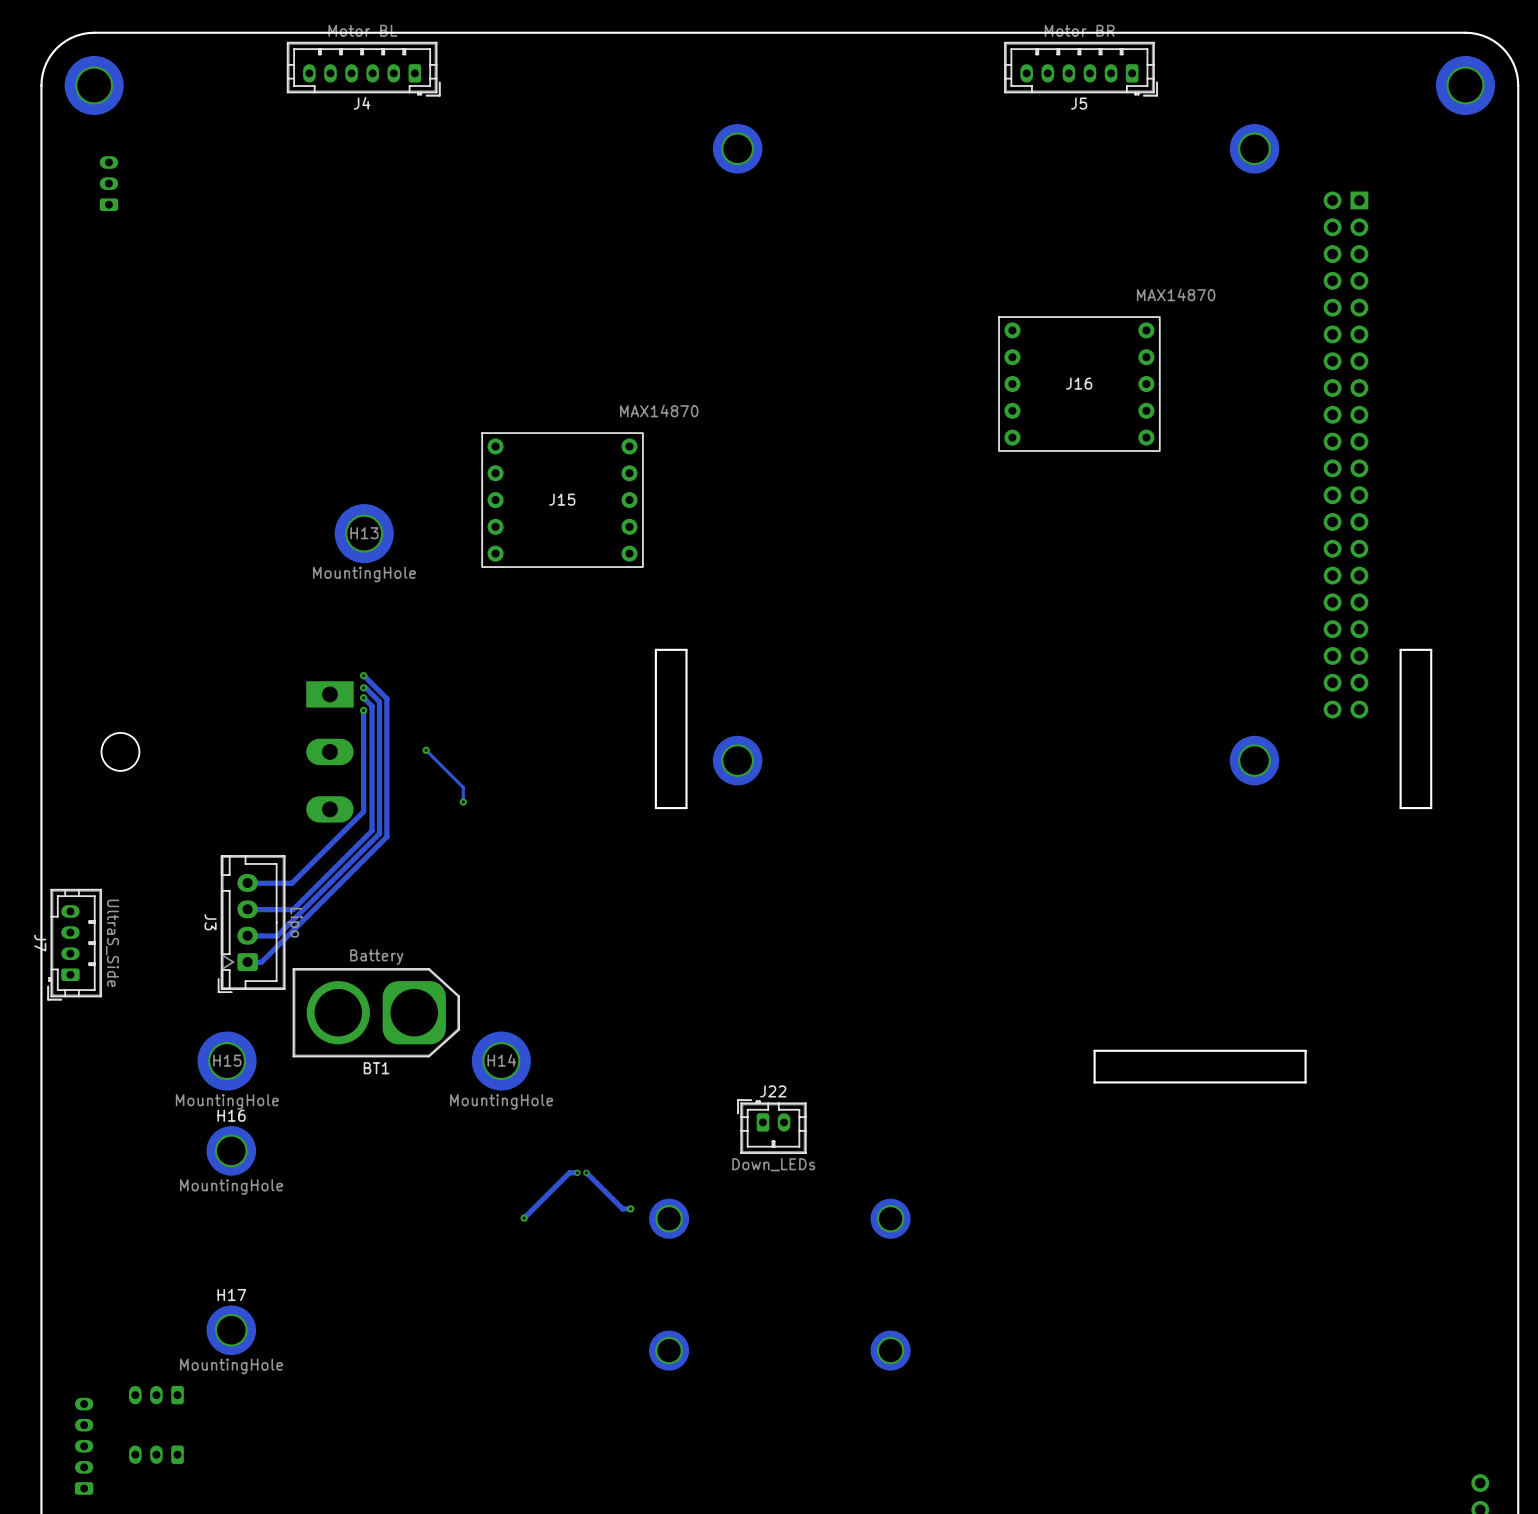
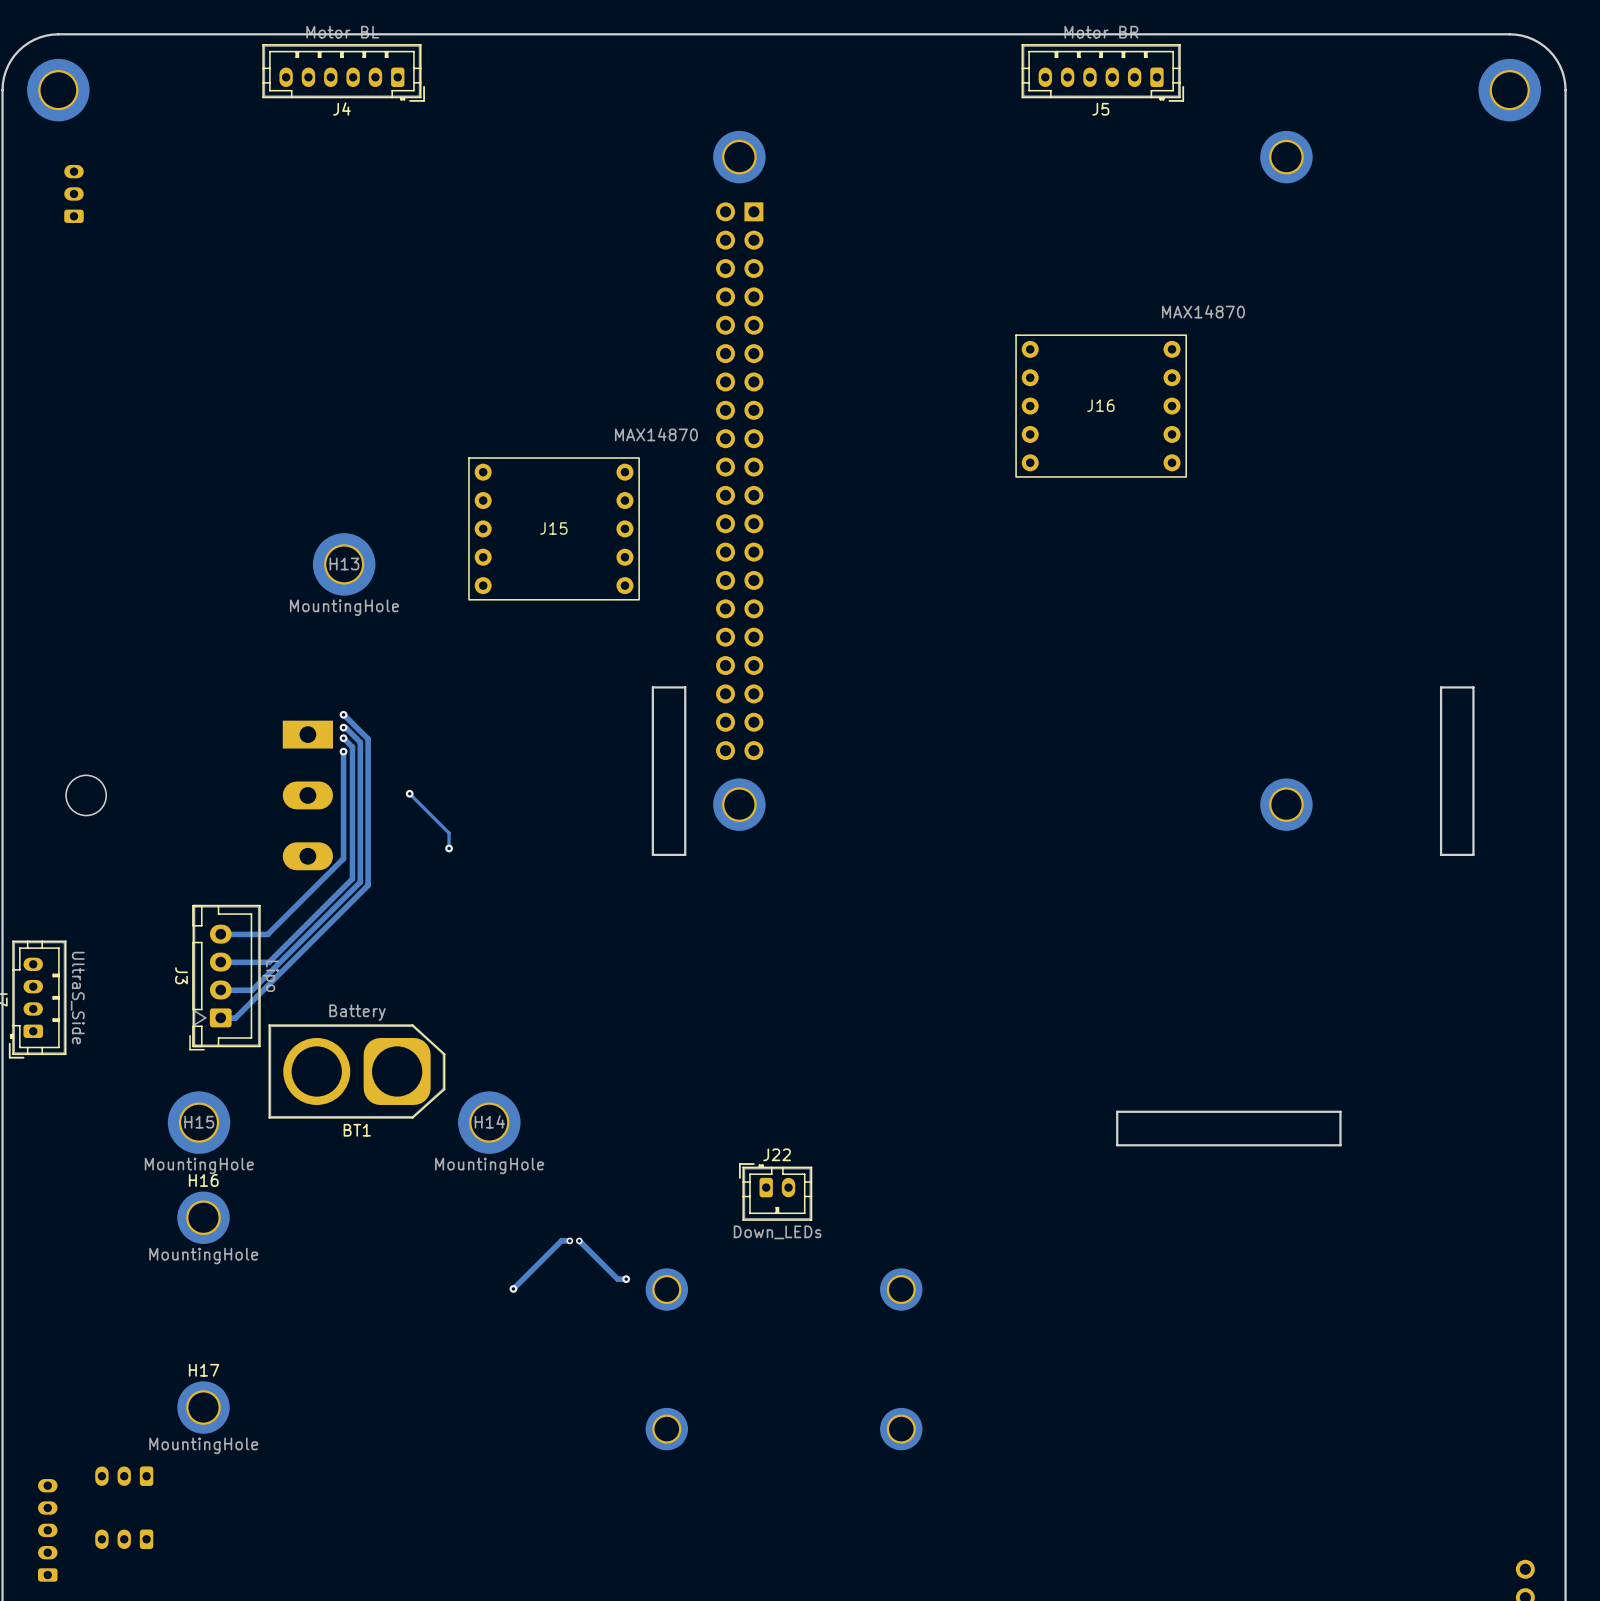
part: none -> (739, 481)
part: (1345, 455) -> none

